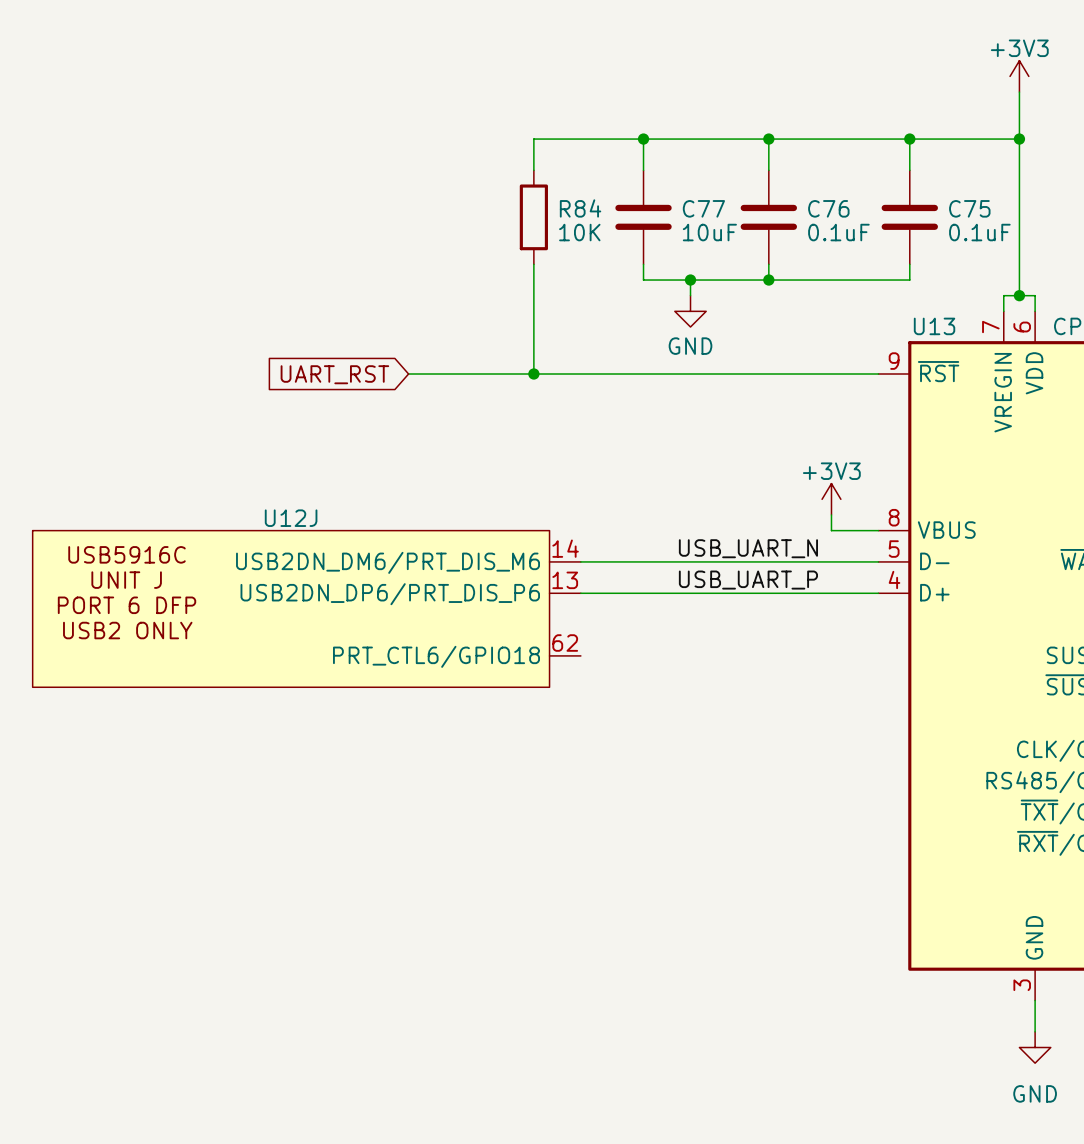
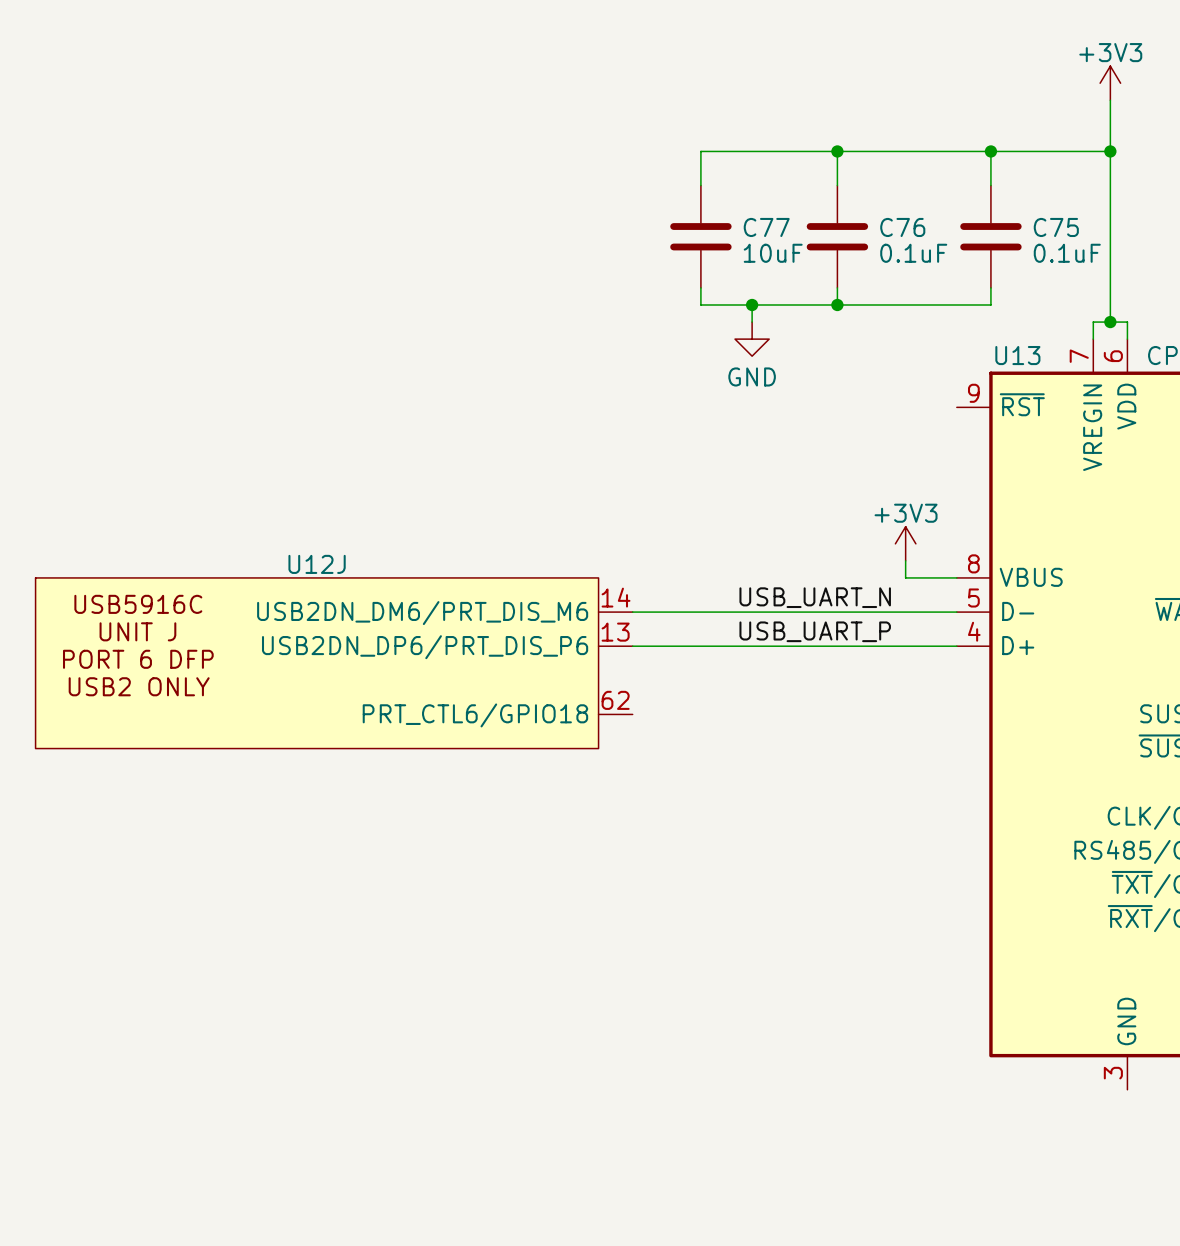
wire: (643, 139) (533, 139) (533, 170) -> none
junction: (643, 139) -> none
R84: 10K (533, 217) -> none
wire: (533, 264) (533, 374) -> none
global label: UART_RST (334, 374) -> none
wire: (408, 374) (878, 374) -> none
junction: (533, 374) -> none
wire: (1035, 1000) (1035, 1031) -> none
power symbol: GND (1035, 1047) -> none

